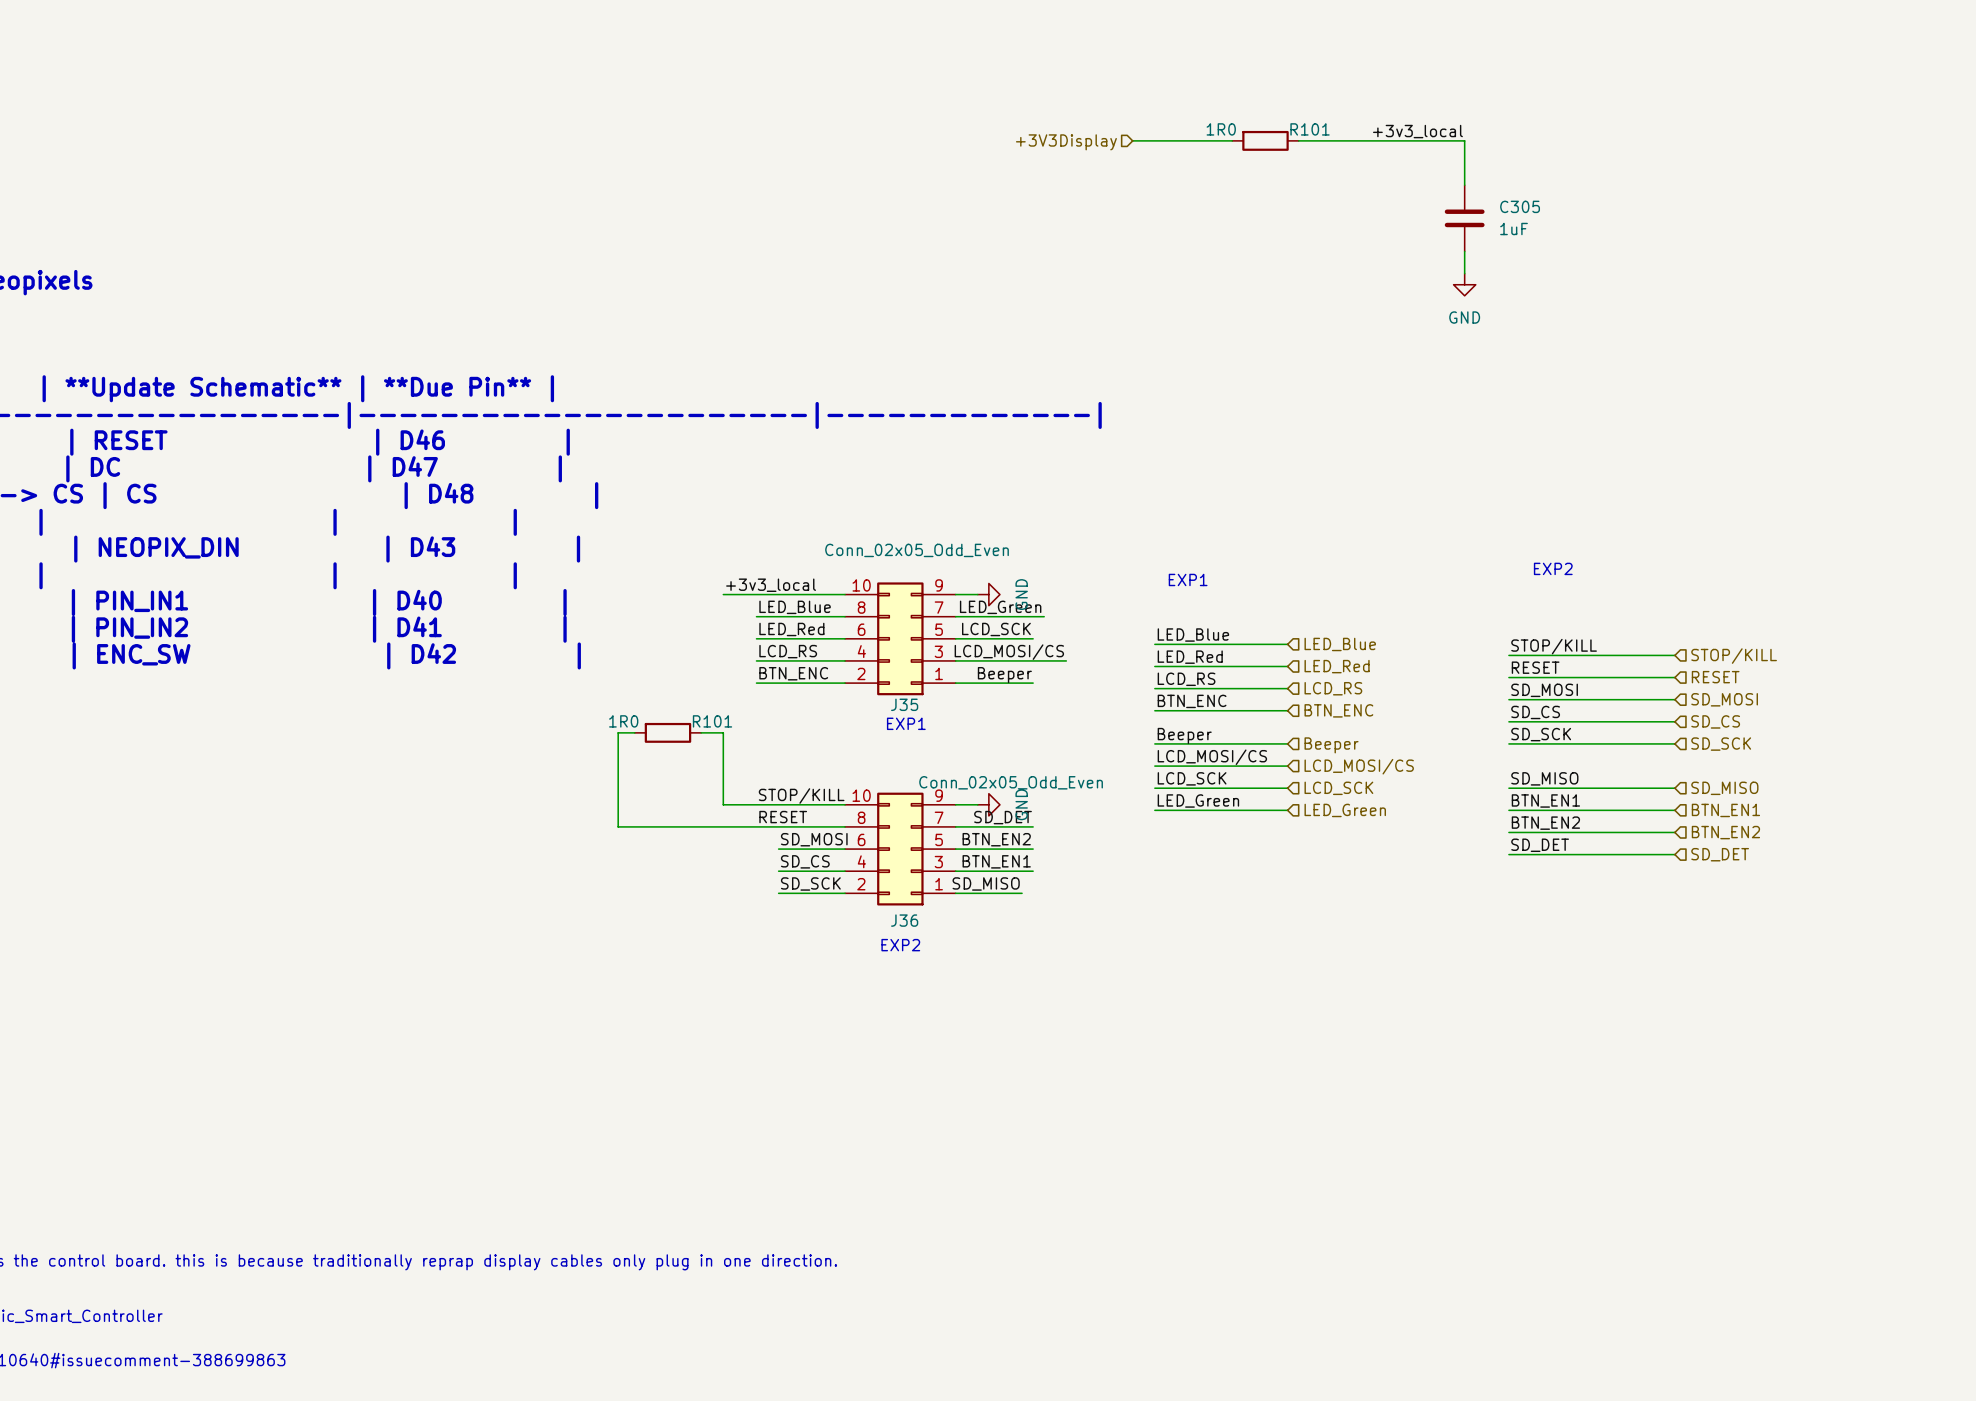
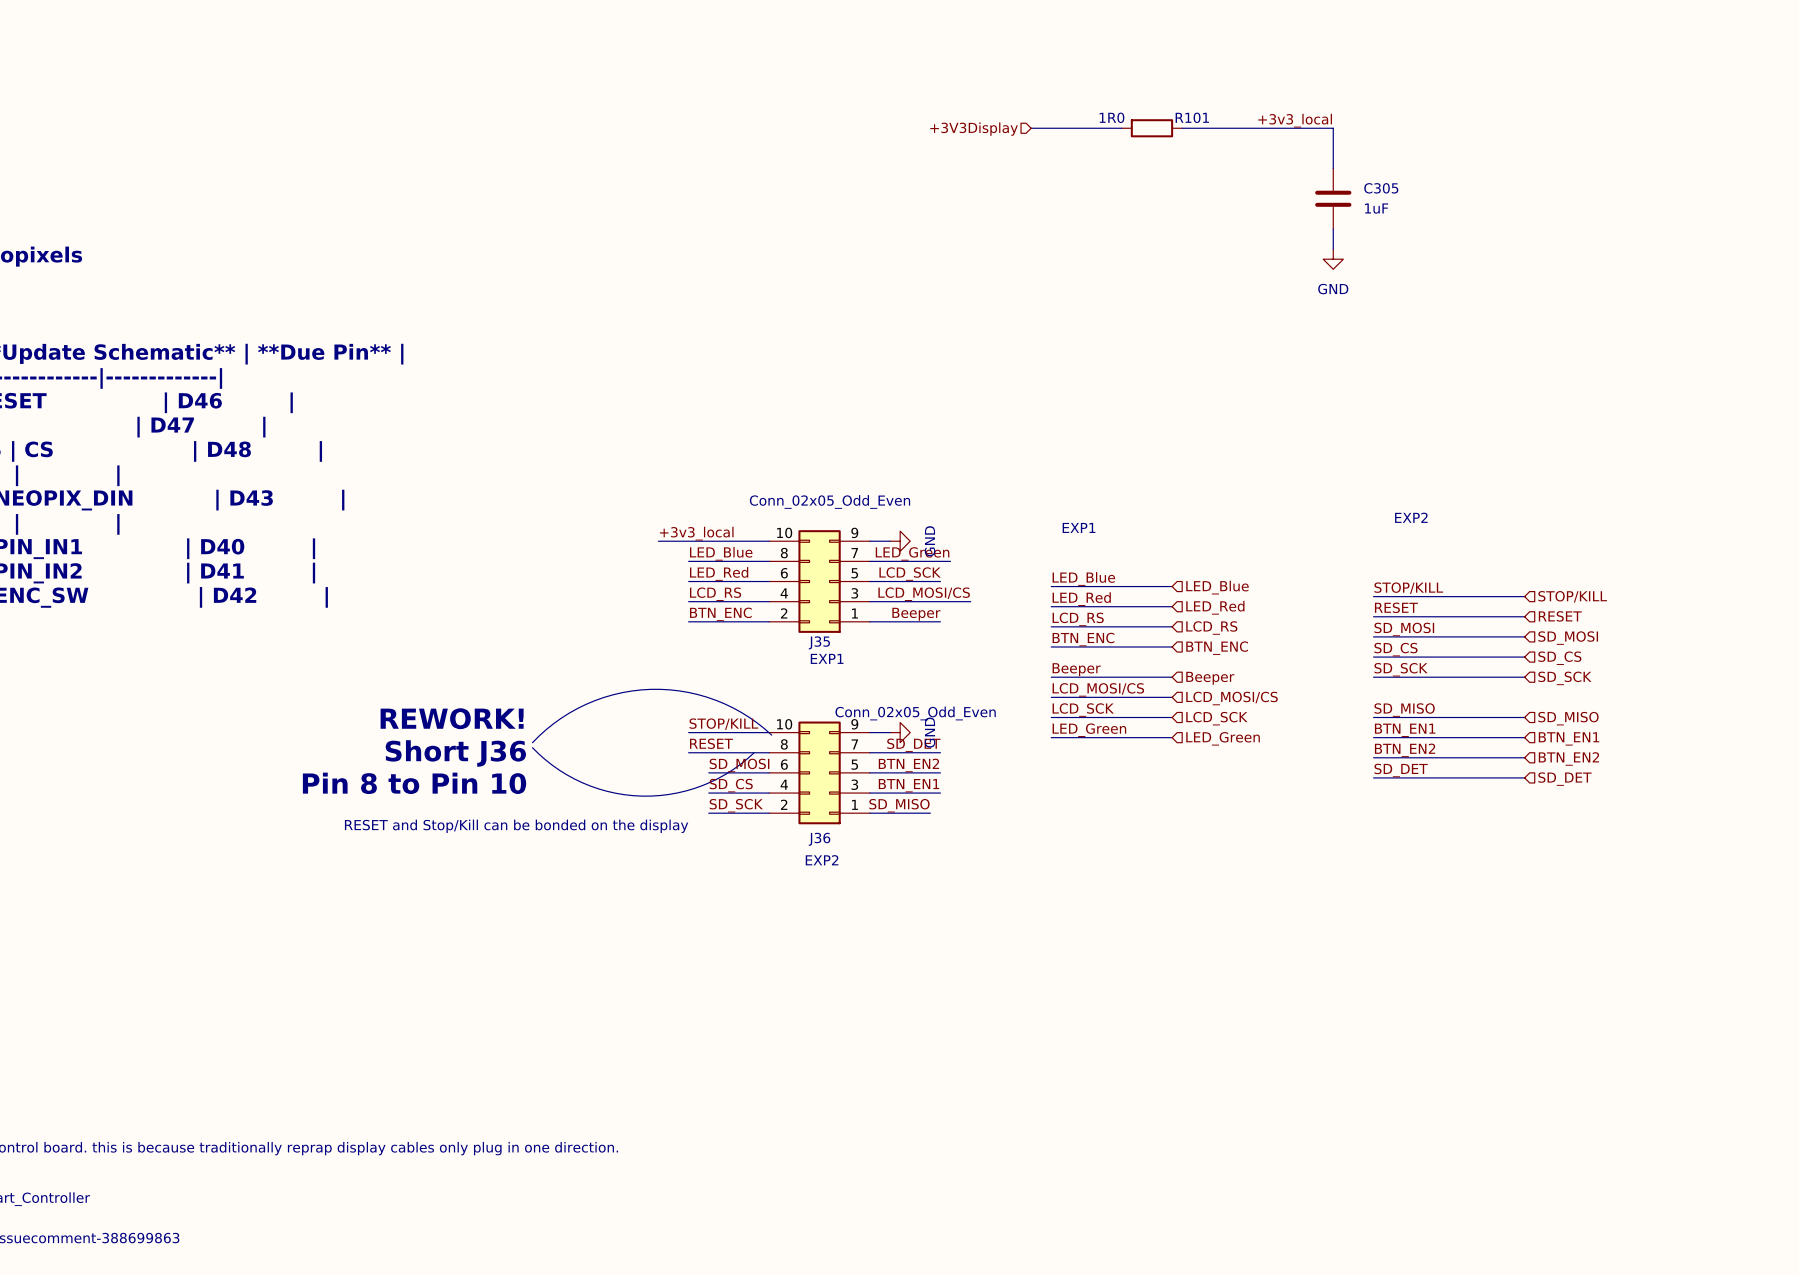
wire: (634, 732) (618, 732) (618, 826) (756, 826) -> none
R101: 1R0 (667, 732) -> none
wire: (701, 732) (723, 732) (723, 804) (756, 804) -> none
text: none -> REWORK! (452, 718)
line: none -> (771, 735) (741, 712) (715, 700) (688, 692) (650, 689) (613, 694) (586, 704) (553, 723) (532, 742)
line: none -> (532, 747) (559, 770) (582, 782) (616, 793) (642, 796) (668, 794) (702, 785) (726, 774) (754, 752)
text: none -> Short J36 (455, 753)
text: none -> Pin 8 to Pin 10 (414, 783)
text: none -> RESET and Stop/Kill can be bonded on the display (516, 826)

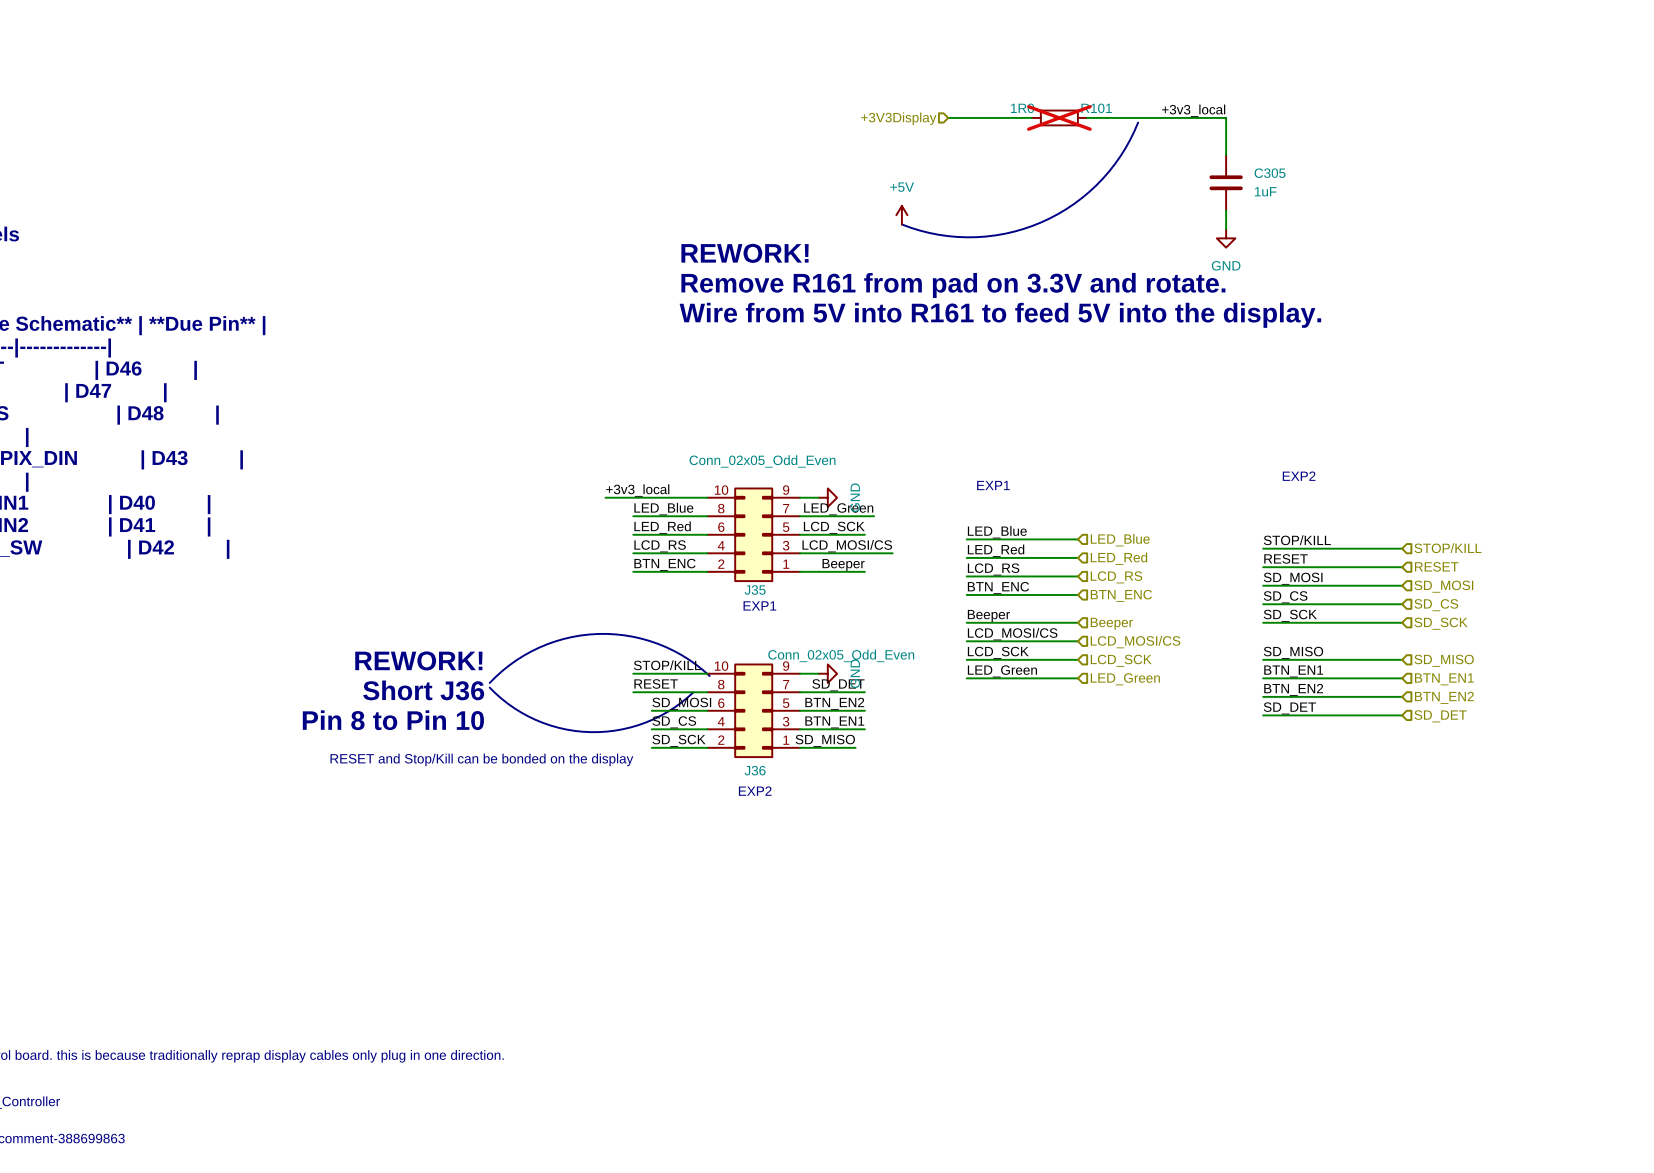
R101 do-not-place cross: none -> (1059, 117)
line: none -> (1138, 122) (1120, 156) (1096, 185) (1066, 209) (1041, 222) (1004, 233) (976, 237) (938, 234) (901, 224)
power symbol: none -> +5V (901, 215)
text: none -> REWORK! (745, 253)
text: none -> Remove R161 from pad on 3.3V and rotate. (953, 285)
text: none -> Wire from 5V into R161 to feed 5V into the display. (1000, 315)

